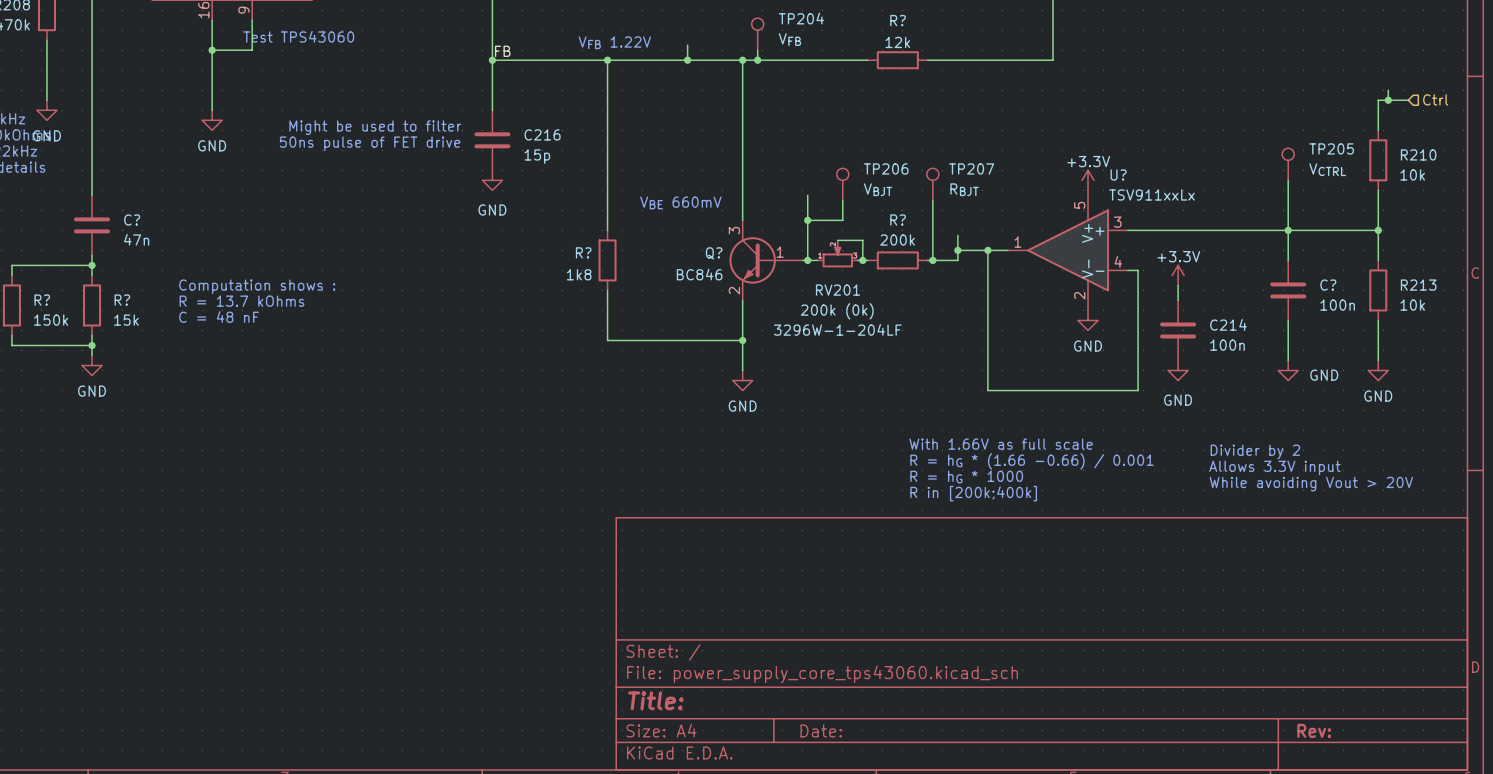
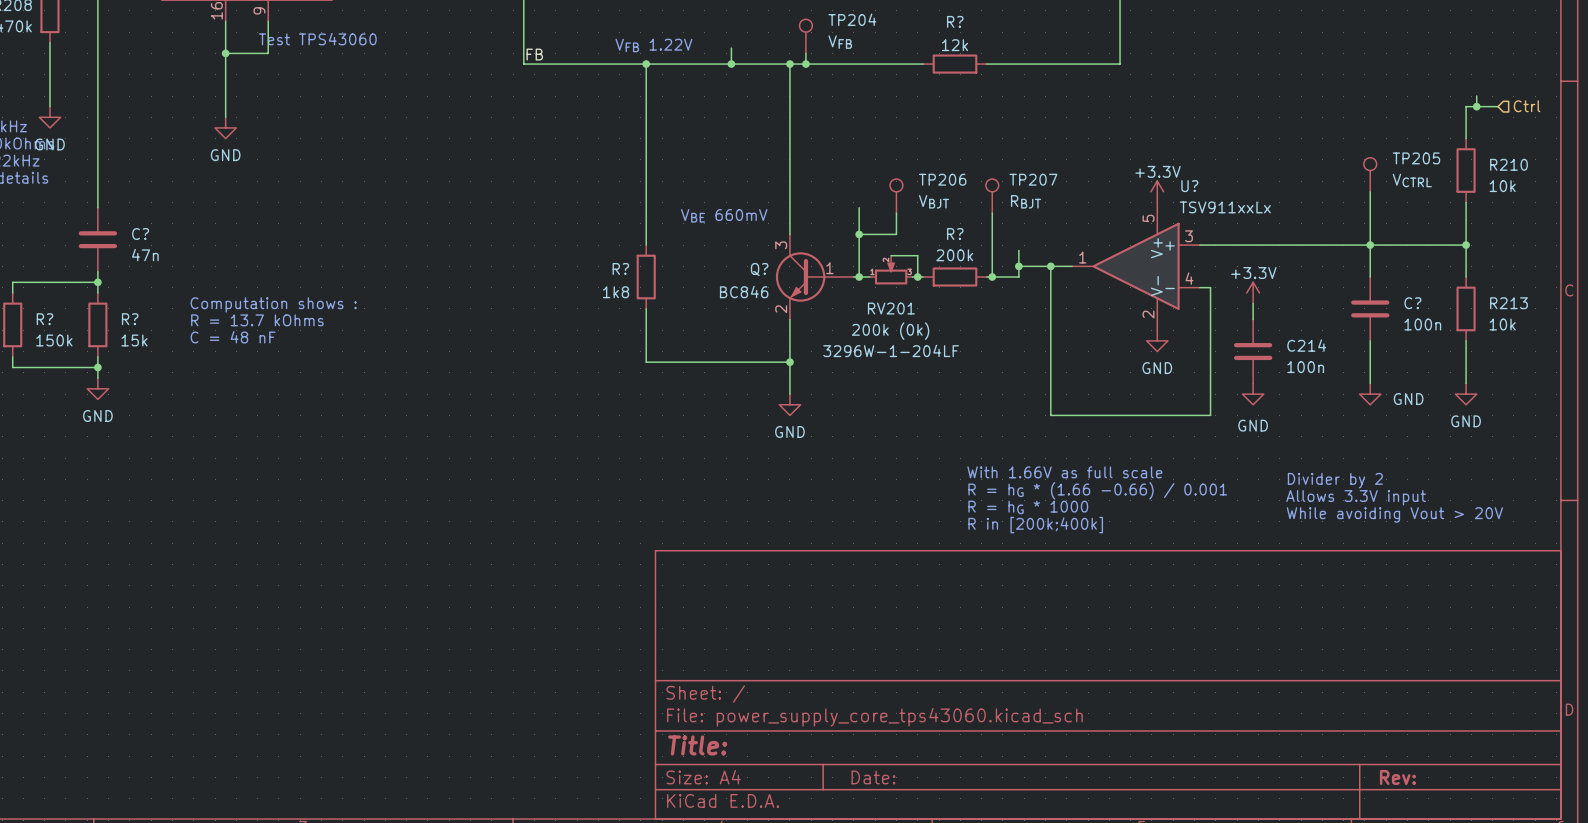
wire: (492, 60) (492, 110) -> none
junction: (492, 60) -> none
text: Might be used to filter (375, 127) -> none
C216: 15p (492, 140) -> none
text: 50ns pulse of FET drive (370, 143) -> none
power symbol: GND (492, 180) -> none

